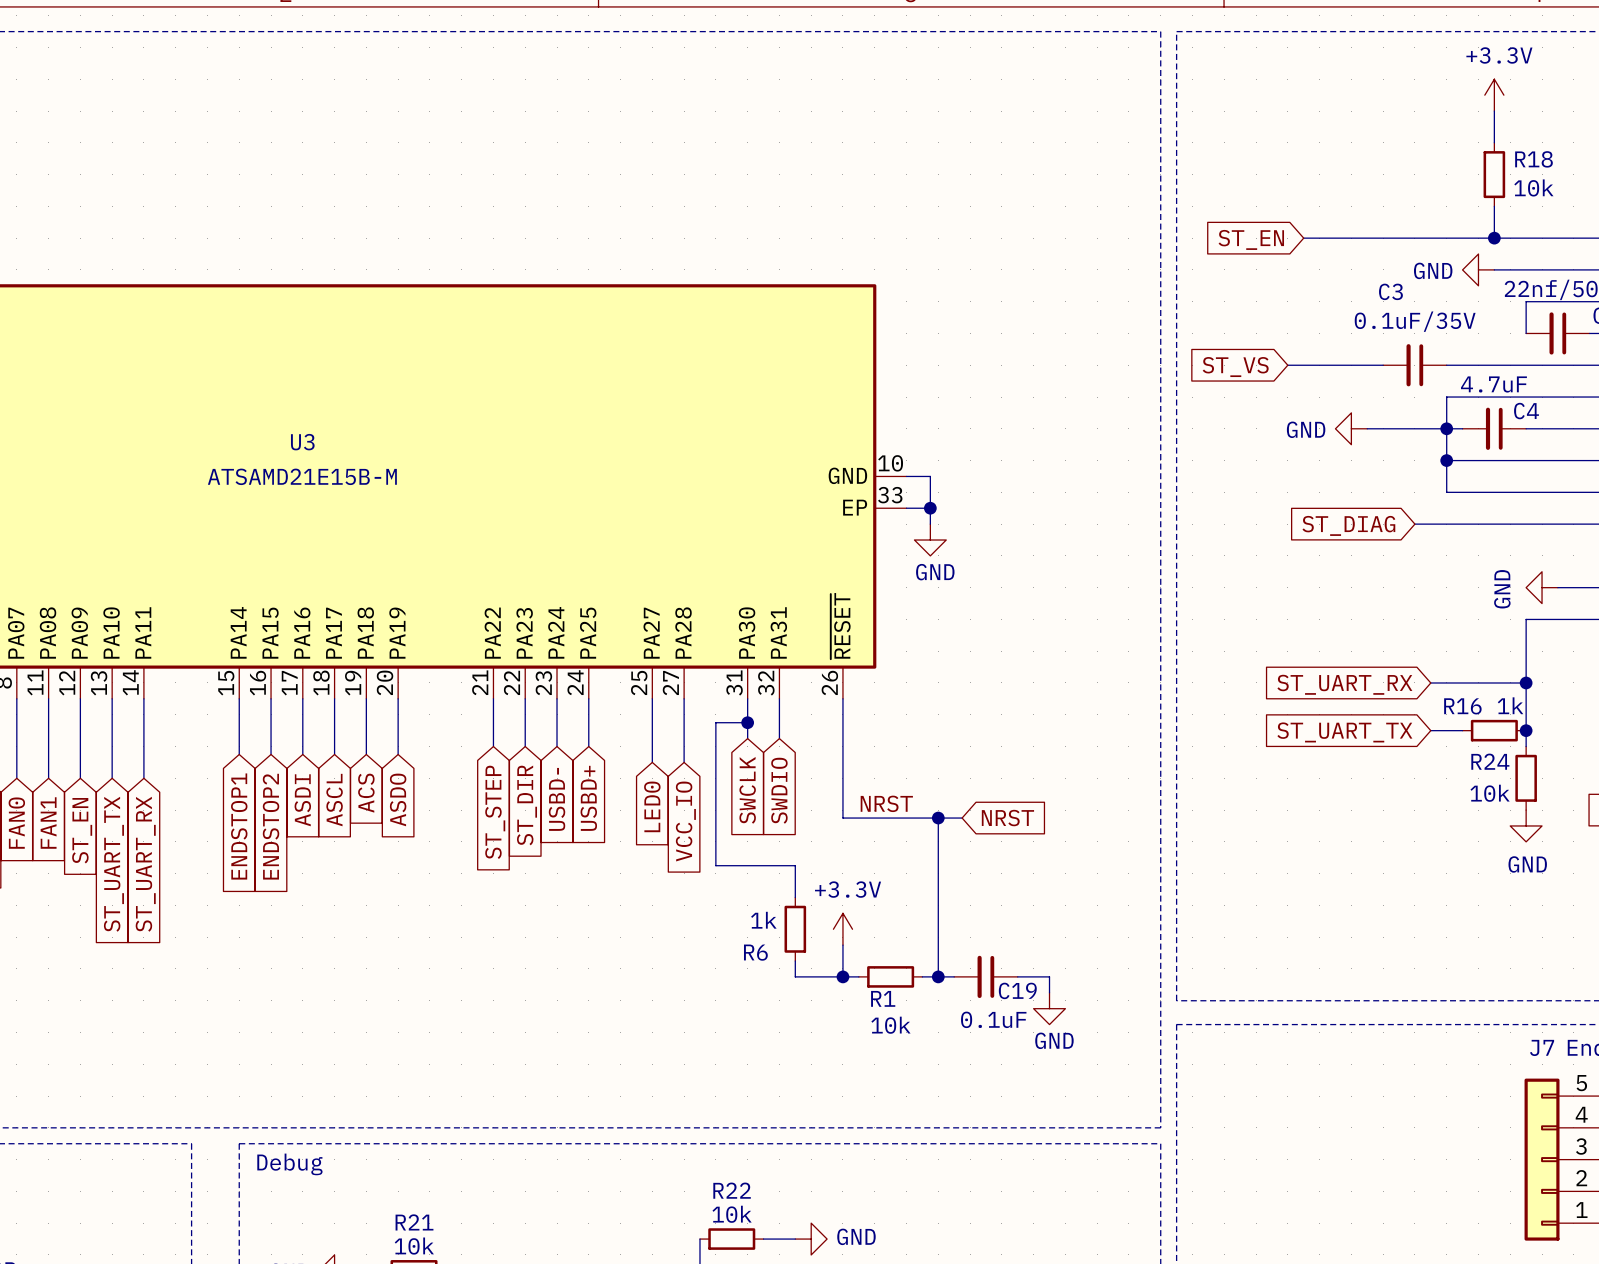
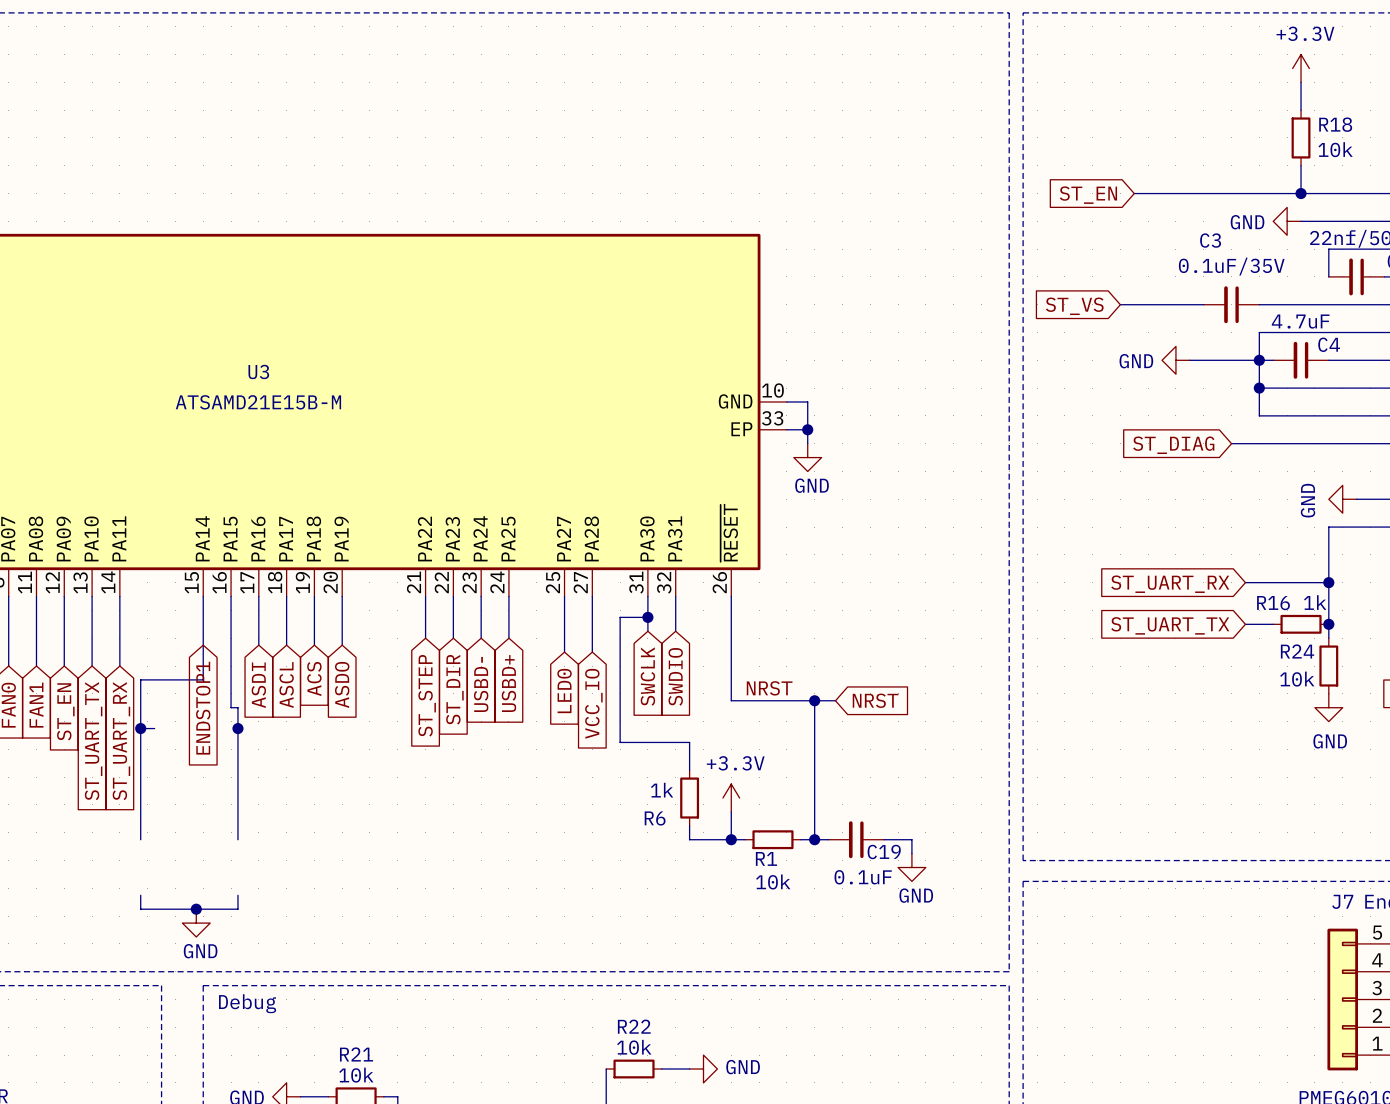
wire: none -> (203, 645) (203, 679) (140, 679) (140, 839)
wire: none -> (231, 645) (231, 707) (237, 707) (237, 839)
global label: ENDSTOP2 (271, 826) -> none
wire: none -> (140, 728) (154, 728)
junction: none -> (140, 728)
junction: none -> (237, 728)
wire: none -> (140, 895) (140, 909) (237, 909) (237, 895)
junction: none -> (196, 909)
power symbol: none -> GND (196, 923)

